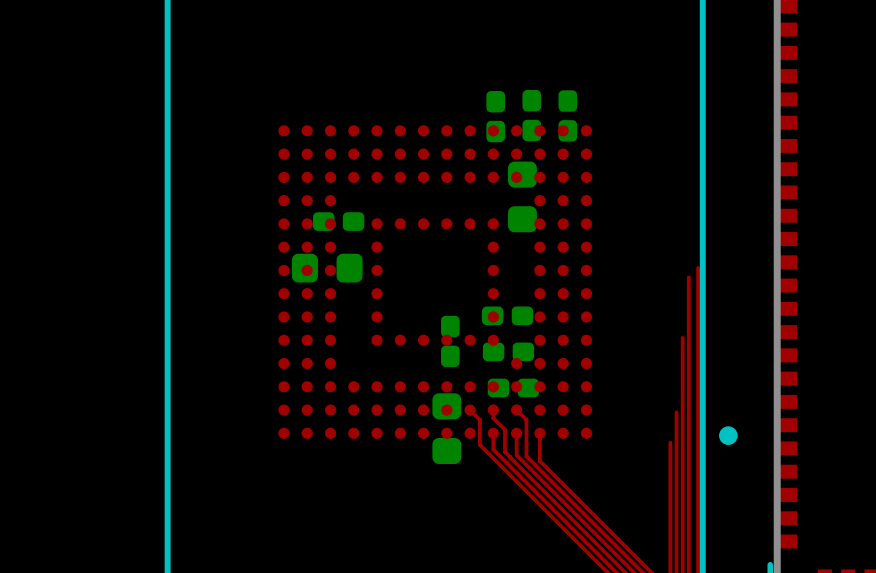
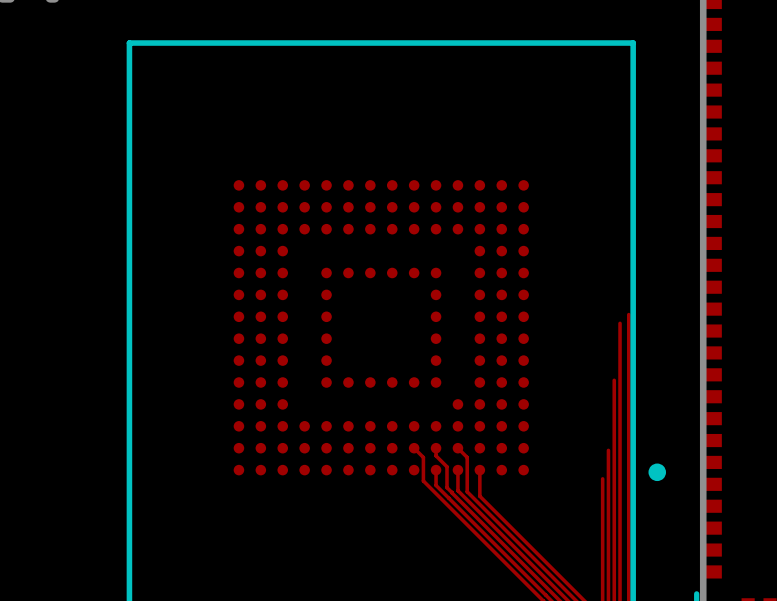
part: (531, 115) -> none
part: (567, 115) -> none
part: (495, 116) -> none
part: (522, 196) -> none
part: (338, 221) -> none
part: (327, 268) -> none
part: (507, 315) -> none
part: (450, 341) -> none
part: (508, 351) -> none
part: (513, 387) -> none
part: (446, 428) -> none

